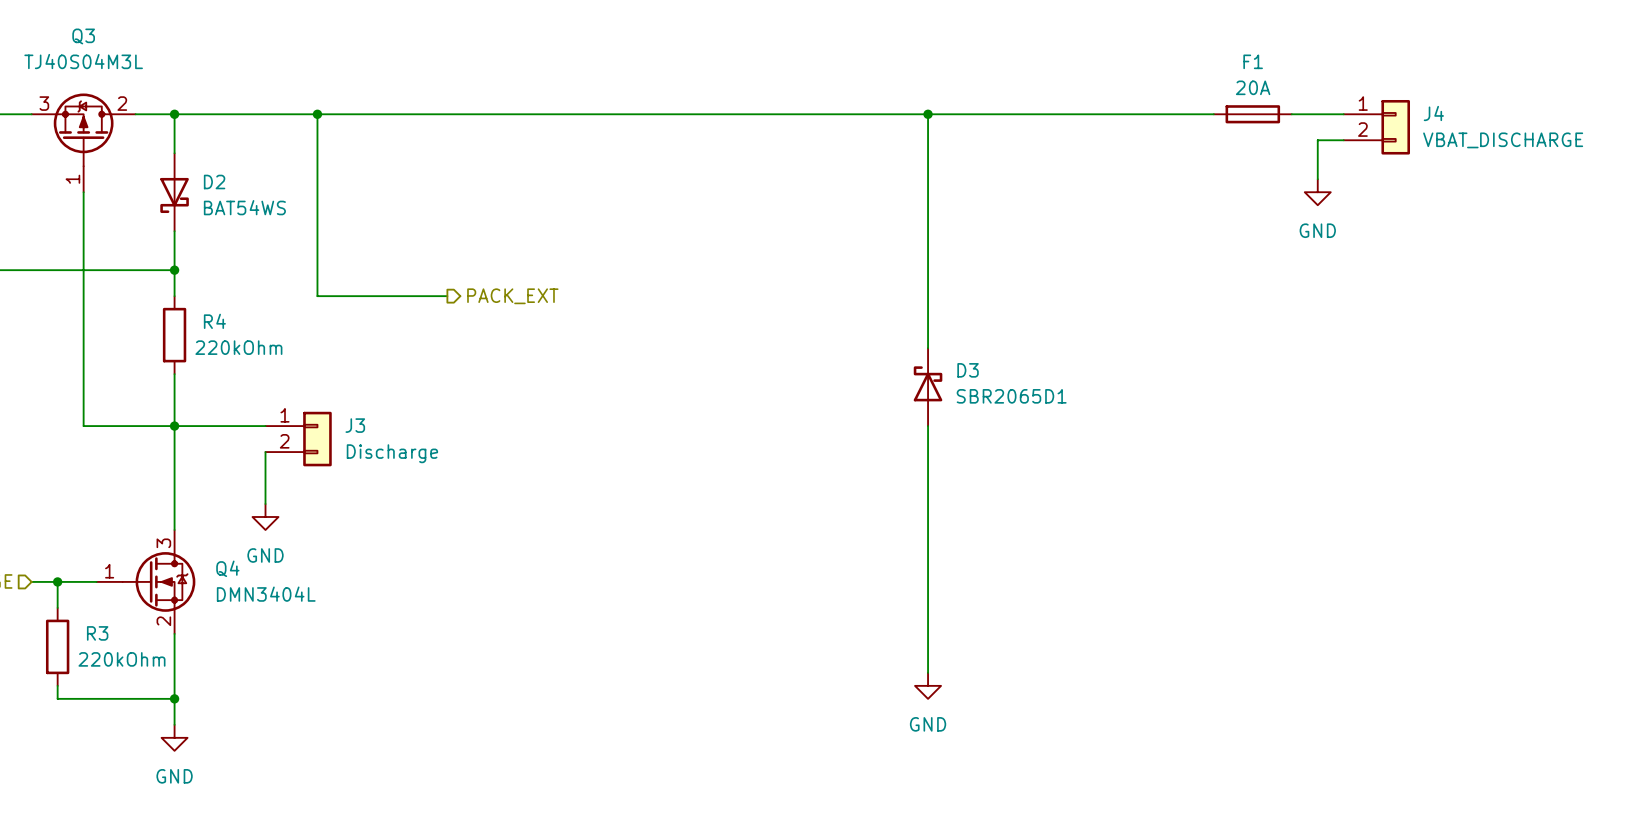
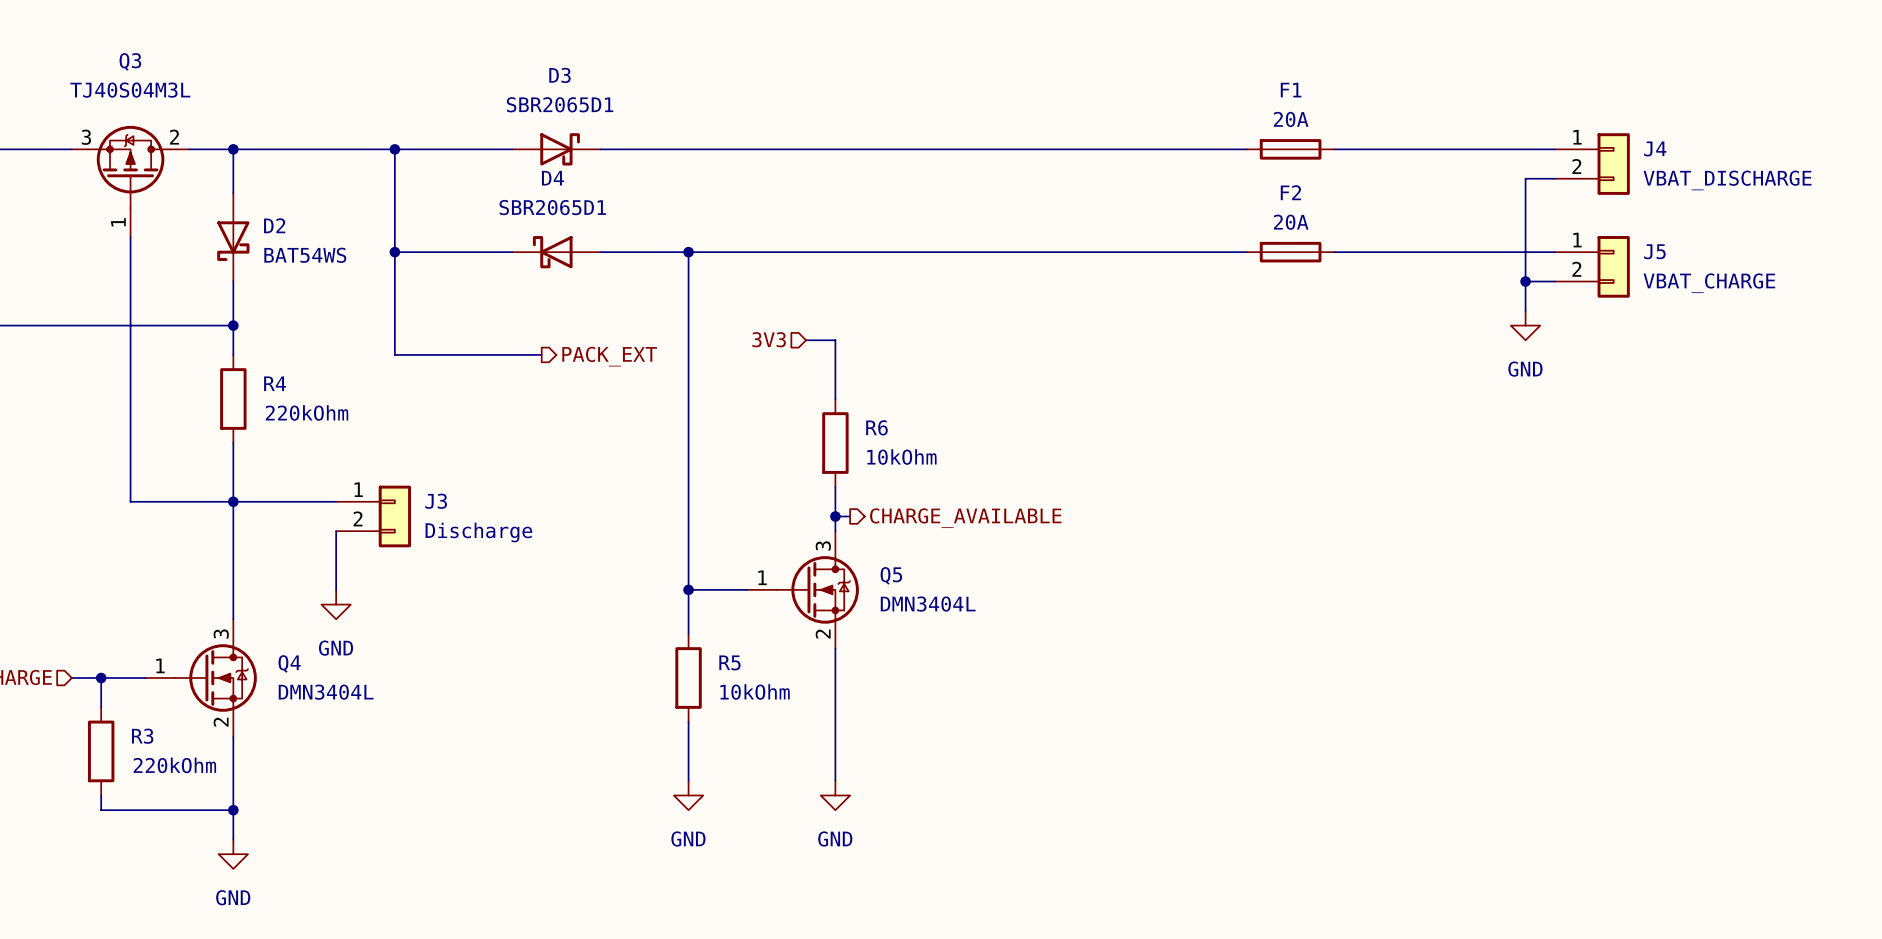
wire: (928, 114) (928, 348) -> none
junction: (928, 114) -> none
F1 position: (1252, 114) -> (1290, 149)
wire: none -> (1525, 222) (1525, 310)
power symbol position: GND (1317, 192) -> GND (1525, 325)
wire: none -> (394, 252) (512, 252)
junction: none -> (394, 252)
D4: none -> SBR2065D1 (556, 252)
wire: none -> (600, 252) (1246, 252)
wire: none -> (688, 252) (688, 633)
junction: none -> (688, 252)
F2: none -> 20A (1290, 252)
wire: none -> (1334, 252) (1554, 252)
J5: none -> VBAT_CHARGE (1592, 266)
wire: none -> (1525, 281) (1554, 281)
junction: none -> (1525, 281)
hierarchical label: none -> 3V3 (769, 339)
wire: none -> (806, 340) (835, 340) (835, 399)
D3 name position: D3 (968, 370) -> D3 (559, 75)
R6: none -> 10kOhm (835, 443)
D3 rotation: 0° (928, 383) -> 90° clockwise (560, 149)
D3 position: (928, 387) -> (556, 149)
D3 value position: SBR2065D1 (1011, 396) -> SBR2065D1 (560, 104)
wire: none -> (835, 487) (835, 531)
wire: (928, 426) (928, 672) -> none
wire: none -> (835, 516) (850, 516)
junction: none -> (835, 516)
hierarchical label: none -> CHARGE_AVAILABLE (965, 518)
wire: none -> (688, 589) (747, 589)
junction: none -> (688, 589)
Q5: none -> DMN3404L (803, 589)
wire: none -> (835, 648) (835, 780)
R5: none -> 10kOhm (688, 678)
wire: none -> (688, 722) (688, 780)
power symbol: none -> GND (688, 795)
power symbol: none -> GND (835, 795)
power symbol: GND (928, 685) -> none

